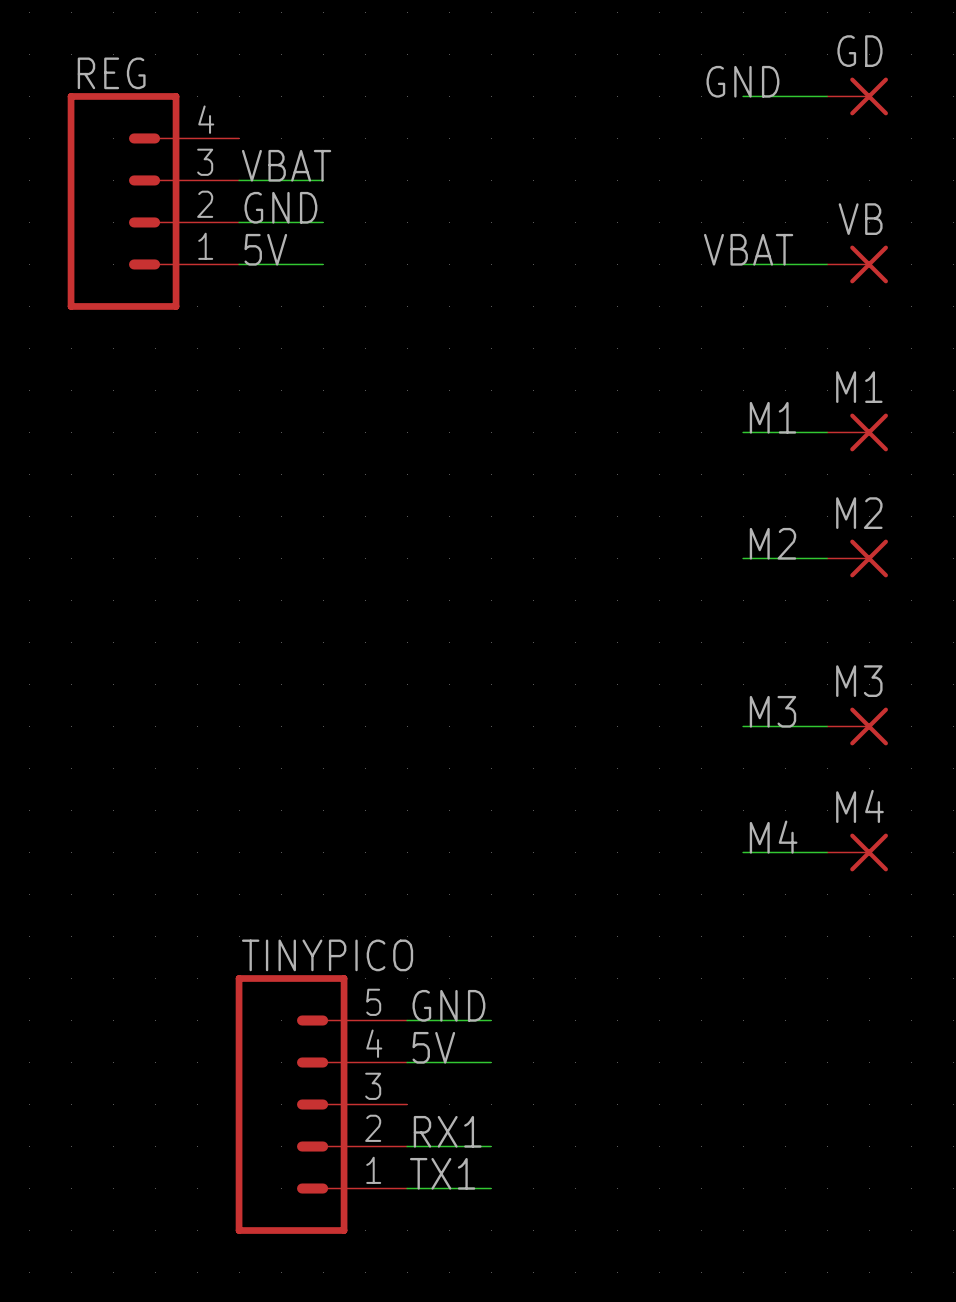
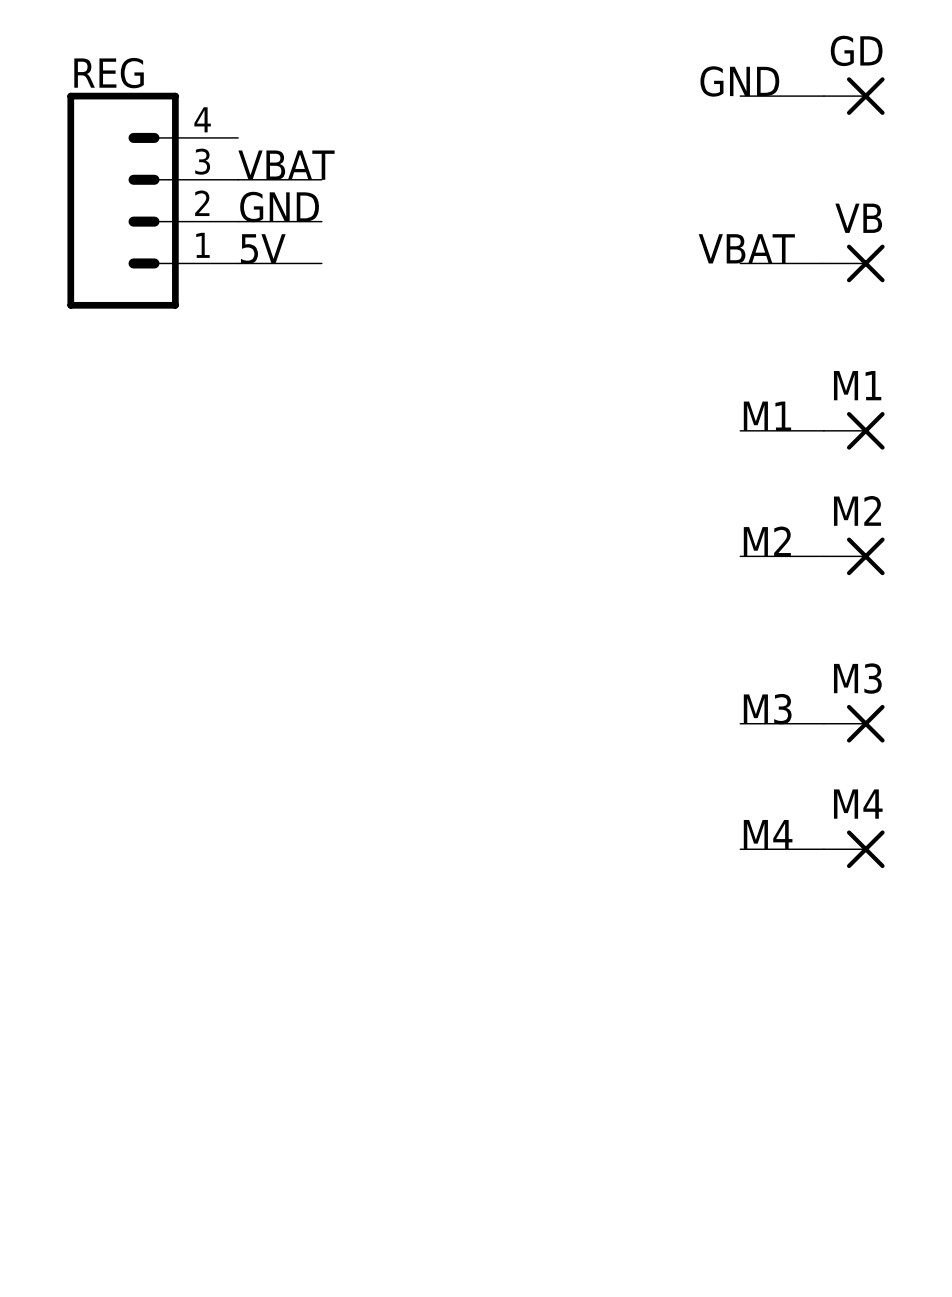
label: GND (448, 1005) -> none
wire: (407, 1020) (491, 1020) -> none
label: 5V (433, 1047) -> none
wire: (407, 1062) (491, 1062) -> none
TINYPICO: (321, 1104) -> none
label: RX1 (447, 1131) -> none
wire: (407, 1146) (491, 1146) -> none
label: TX1 (442, 1173) -> none
wire: (407, 1188) (491, 1188) -> none

